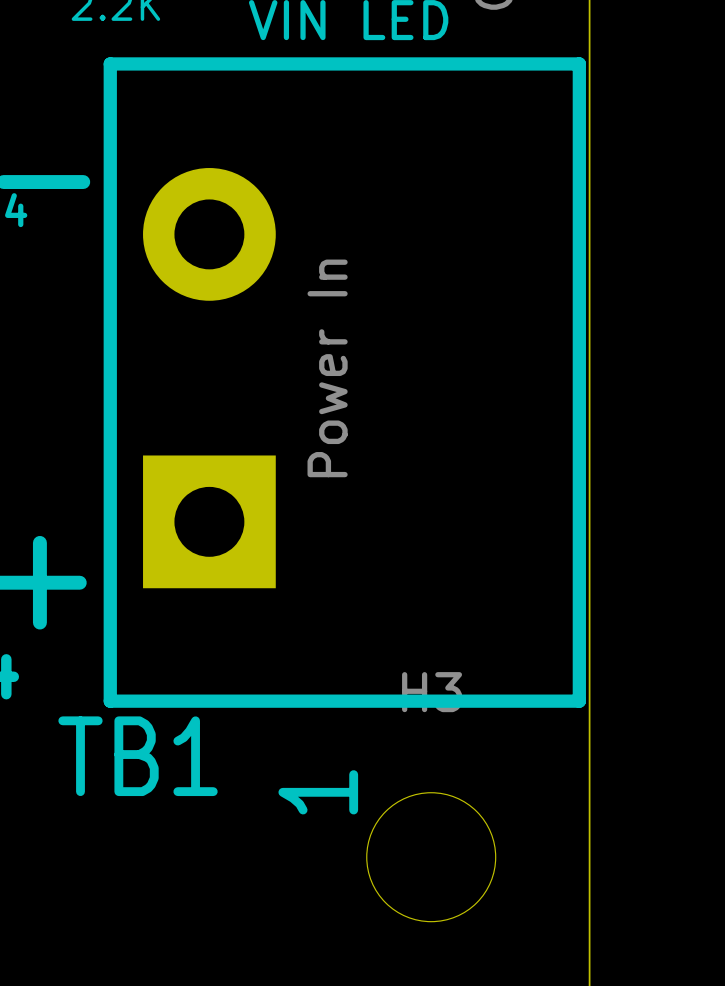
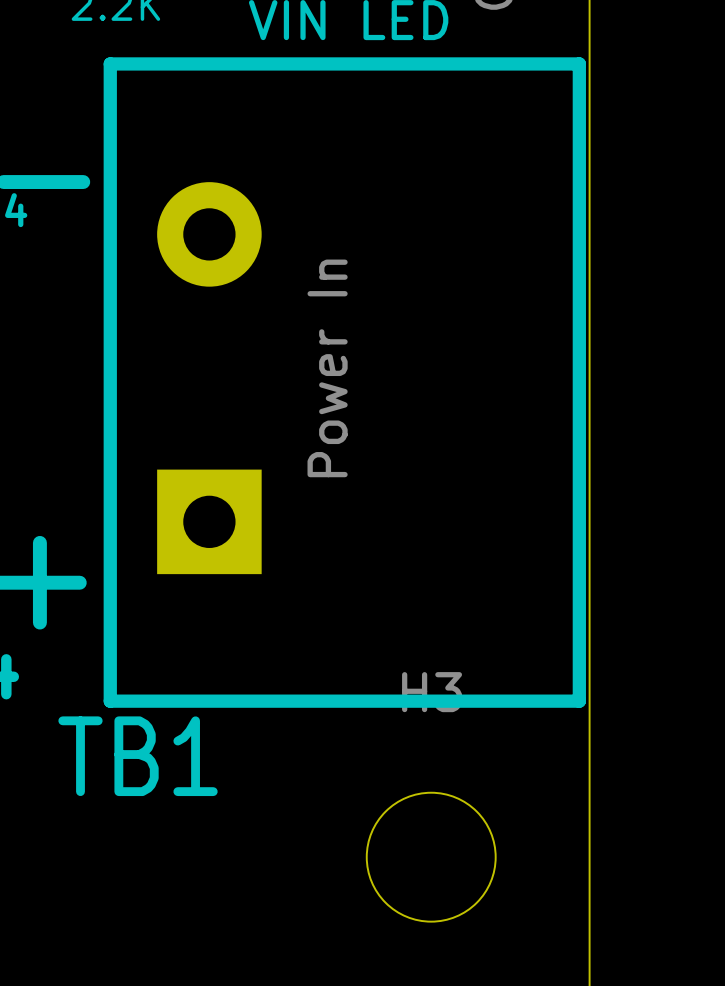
TB1 footprint: [103, 57, 586, 708] -> [103, 57, 586, 708]

